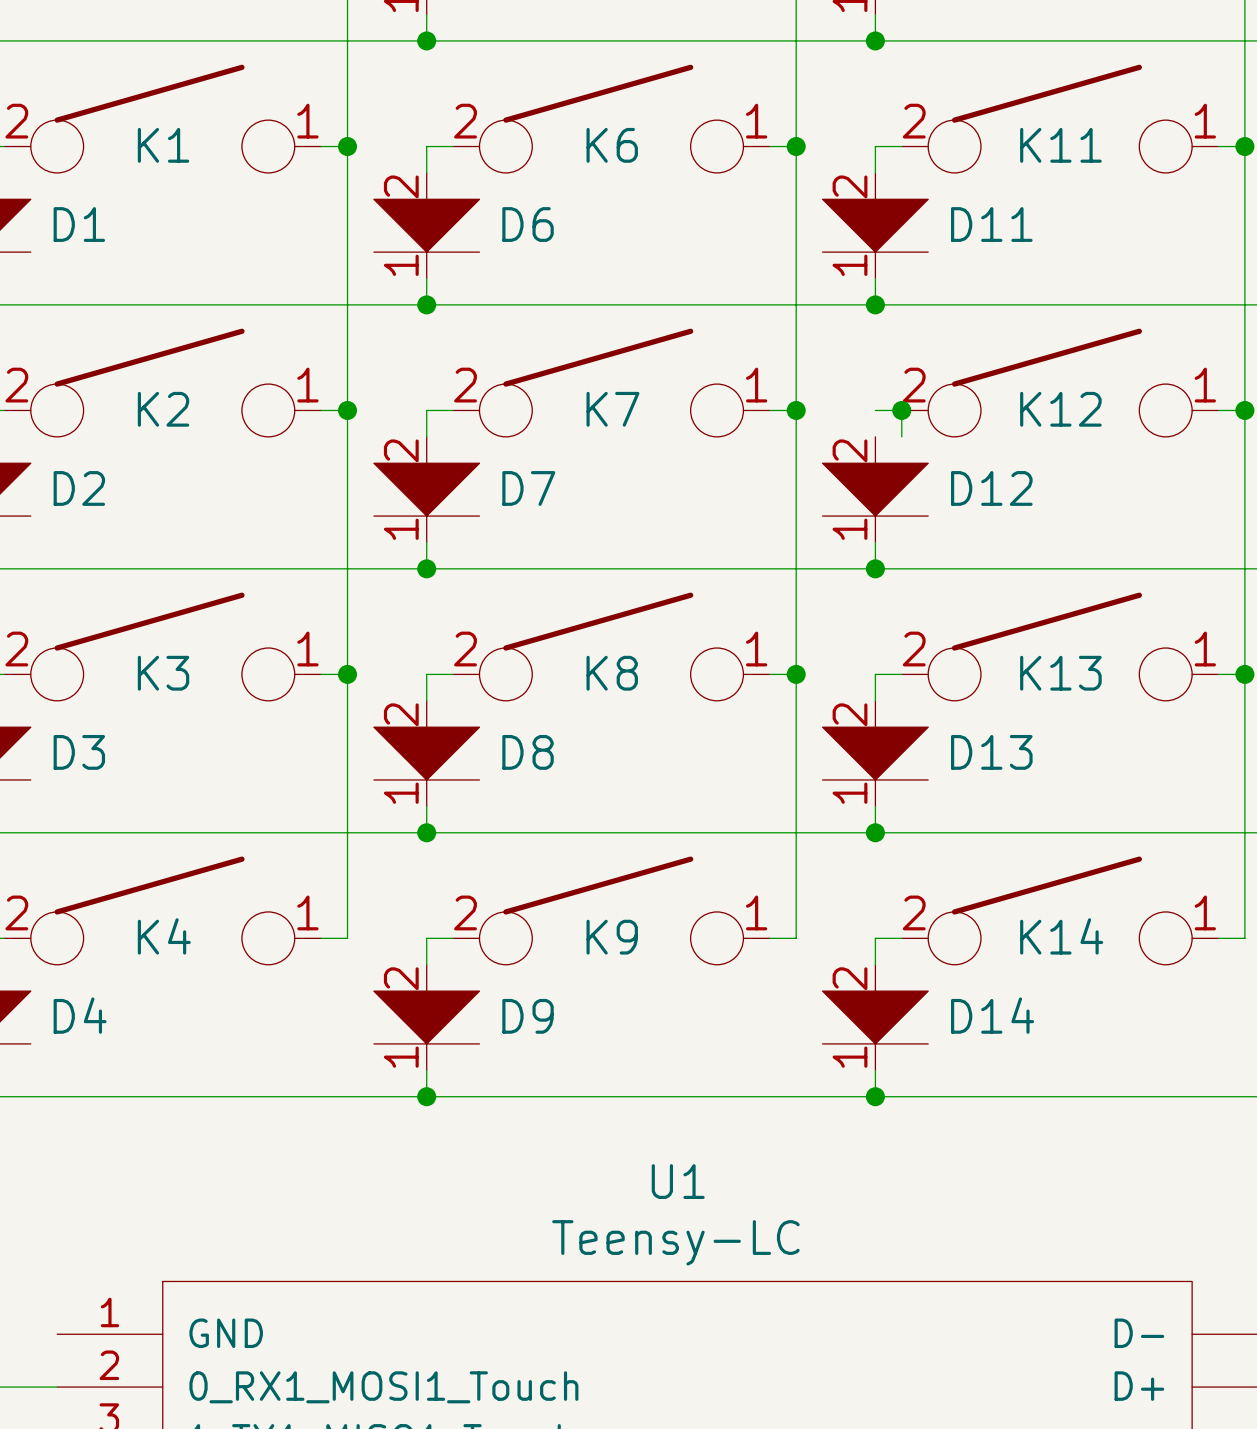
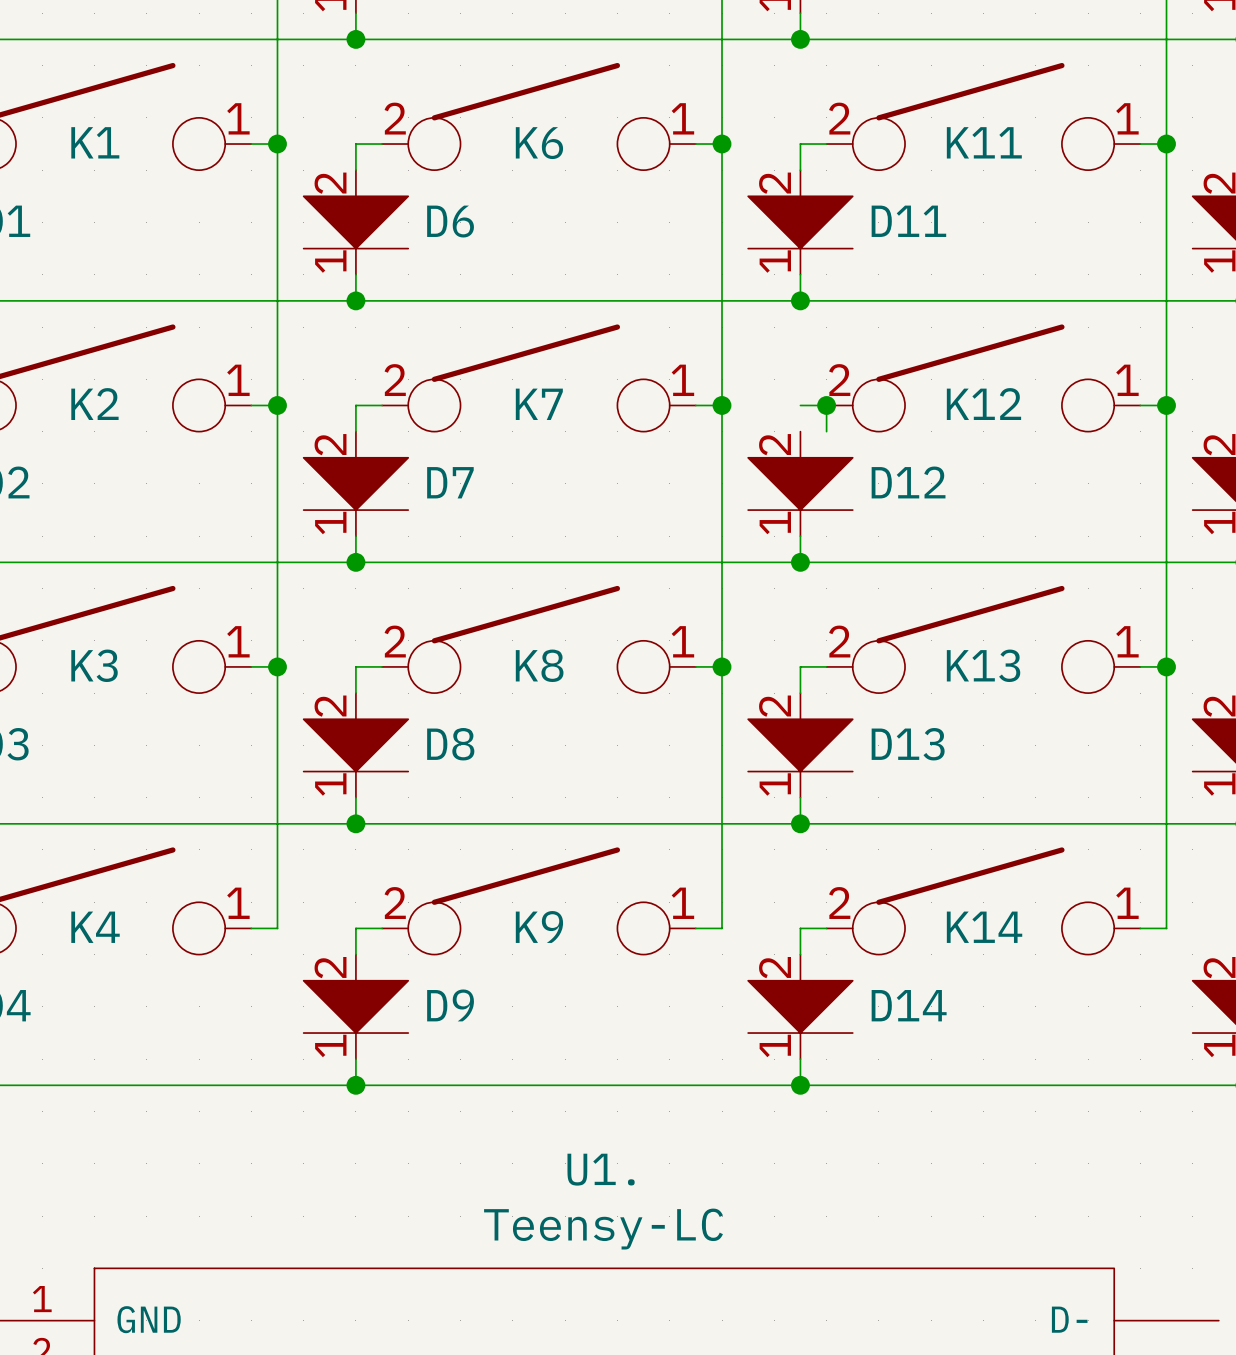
U1 name: U1 (678, 1181) -> U1. (601, 1169)

